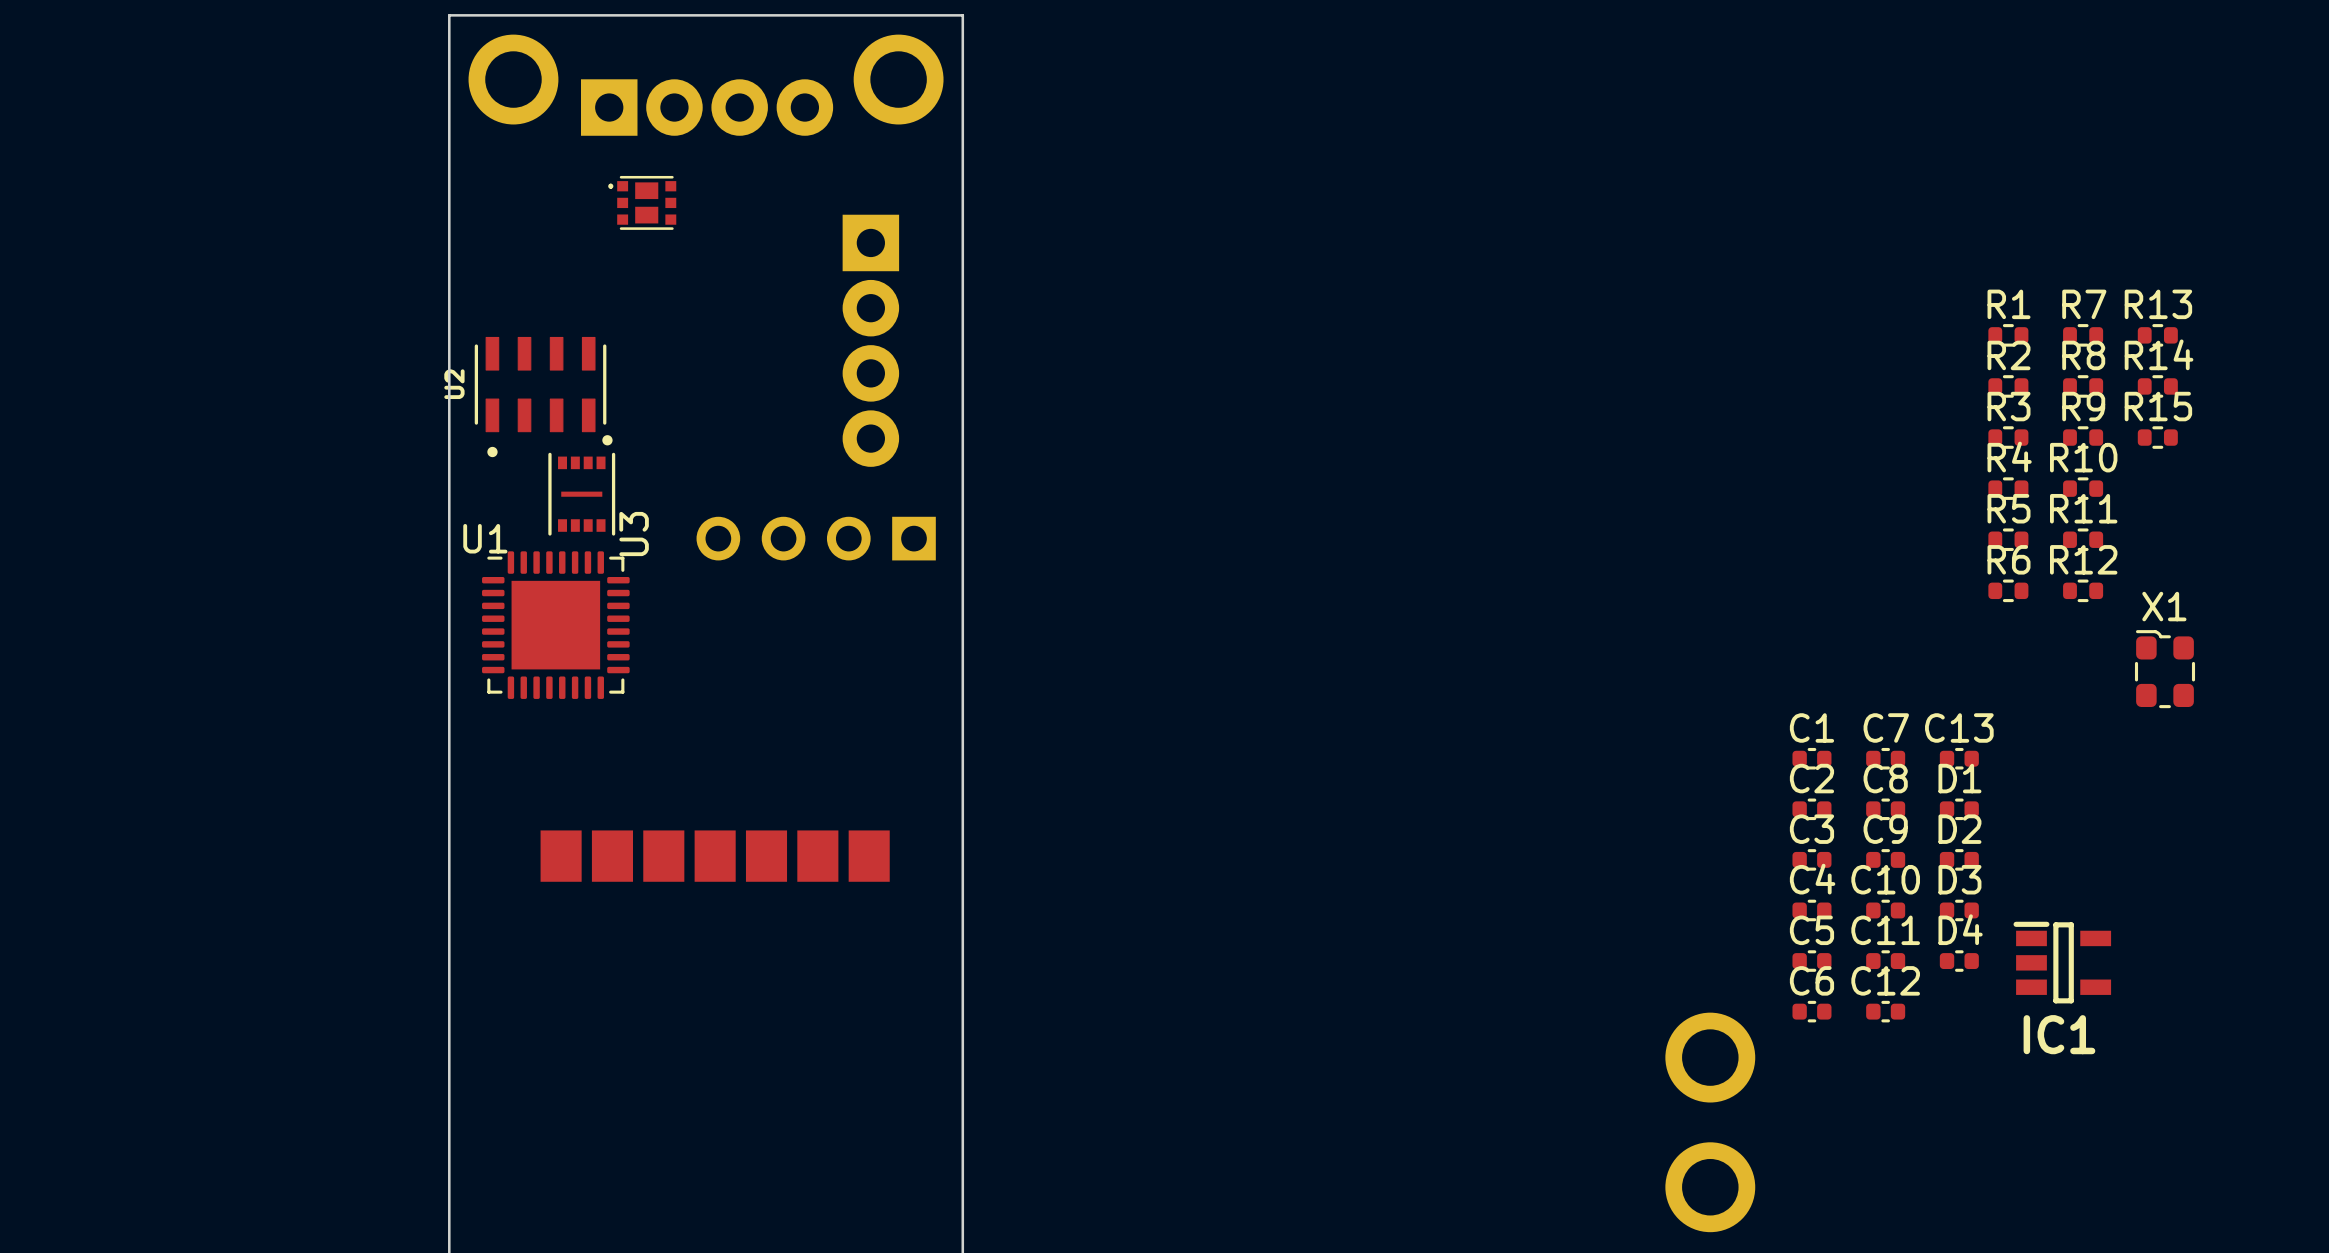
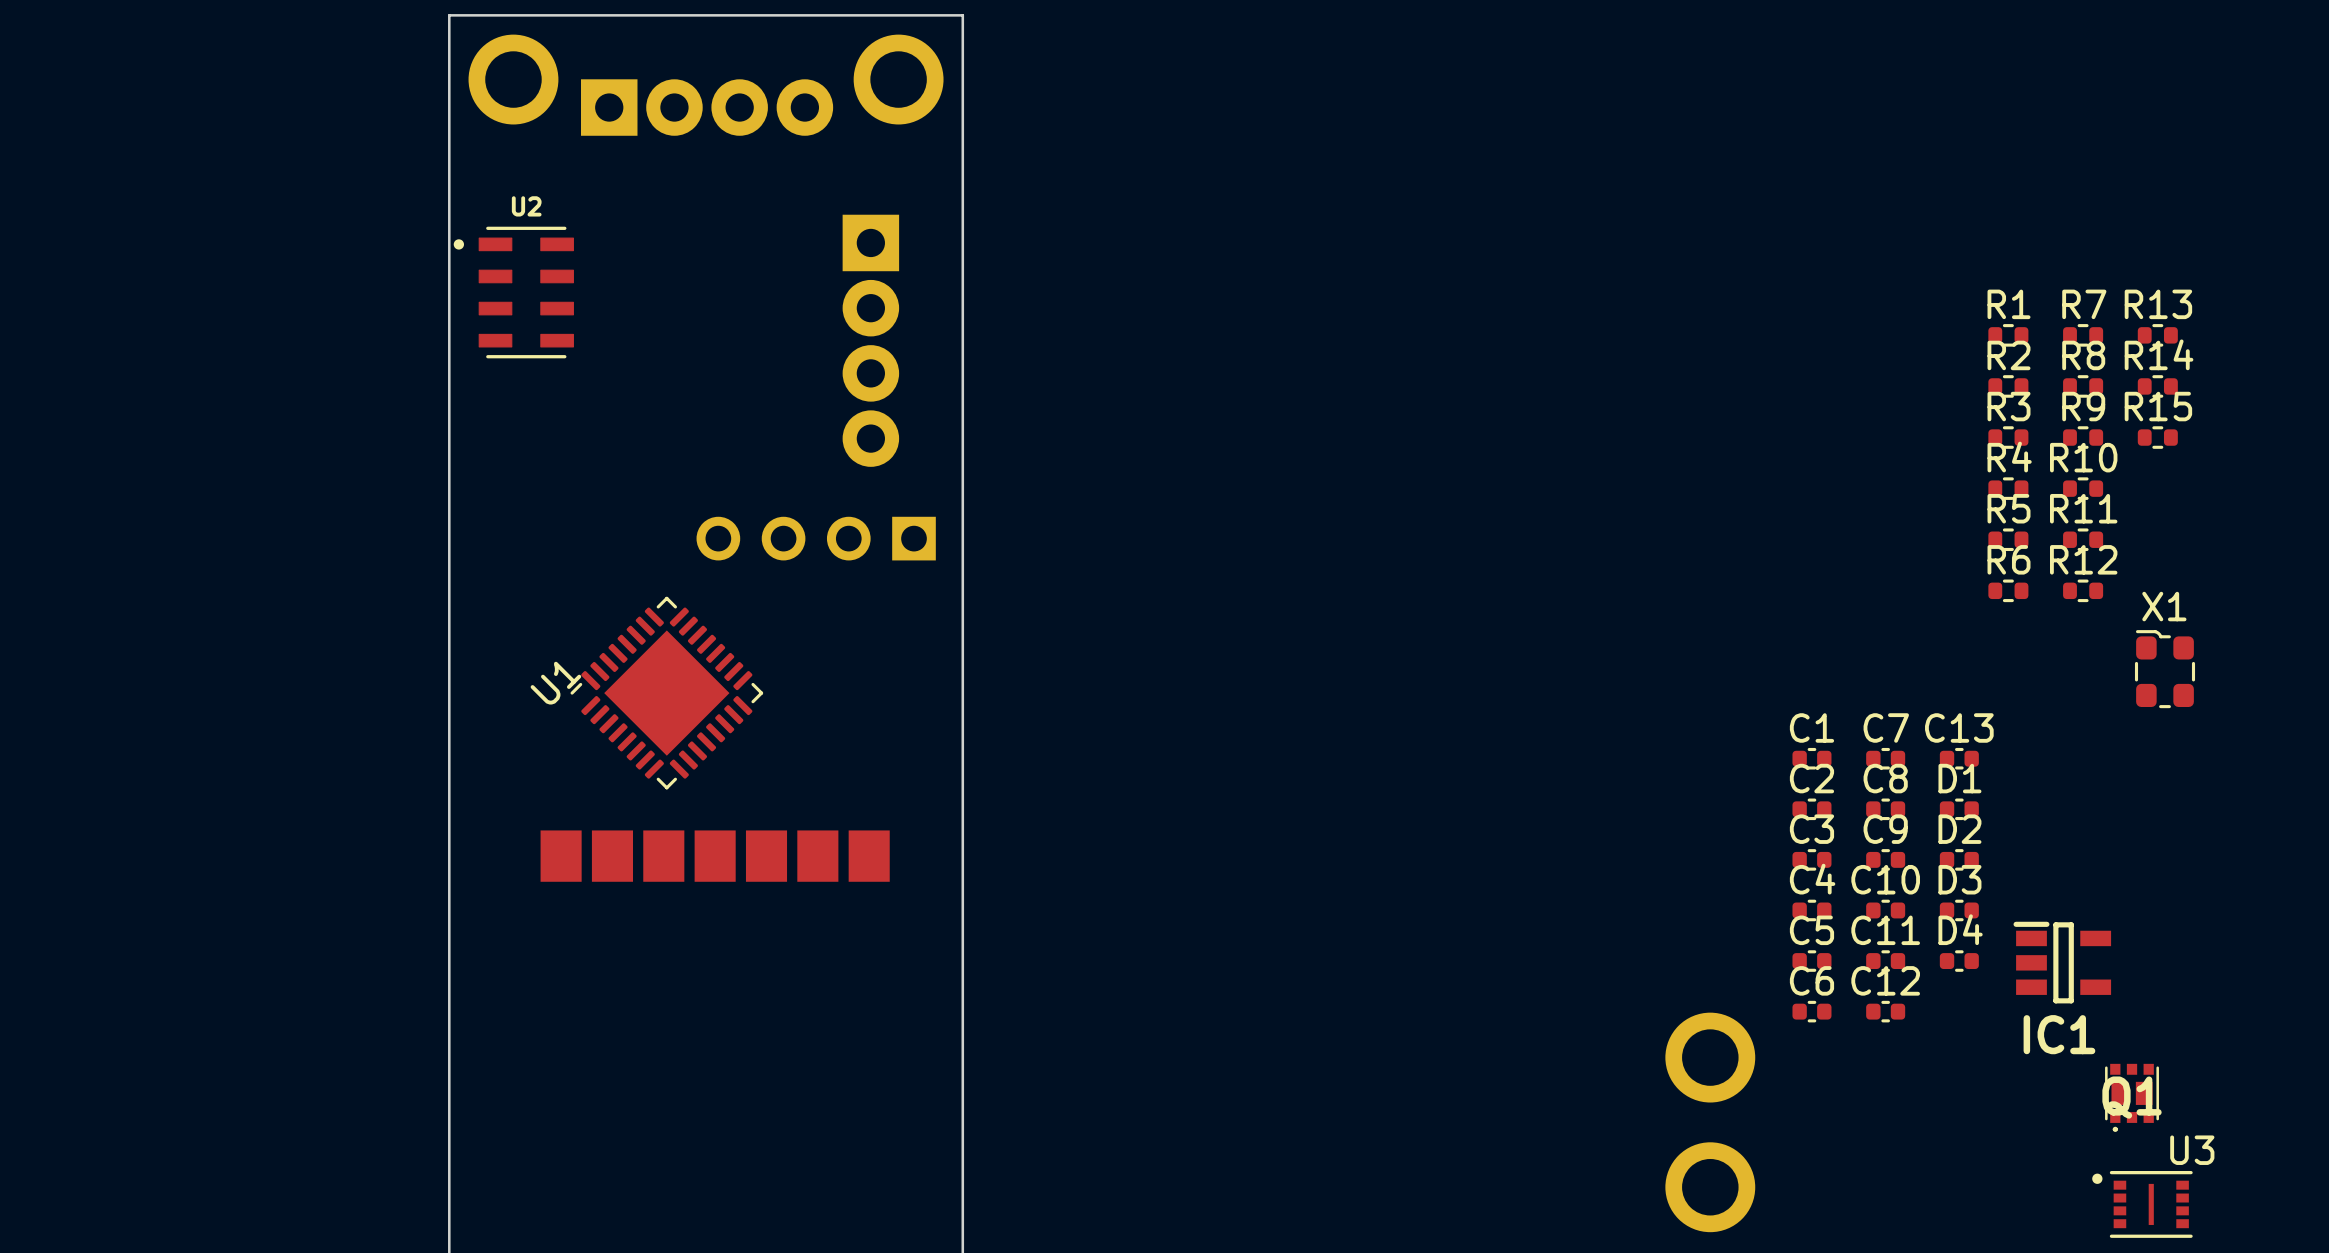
part: (642, 202) -> none
U2 rotation: 0° (540, 397) -> 90° clockwise (513, 292)
U2 position: (540, 397) -> (513, 292)
U3 rotation: 0° (581, 485) -> 90° counterclockwise (2142, 1204)
U3 position: (581, 485) -> (2142, 1204)
U1 rotation: 0° (555, 625) -> 45° counterclockwise (666, 693)
U1 position: (555, 625) -> (666, 693)
Q1: none -> (2132, 1097)

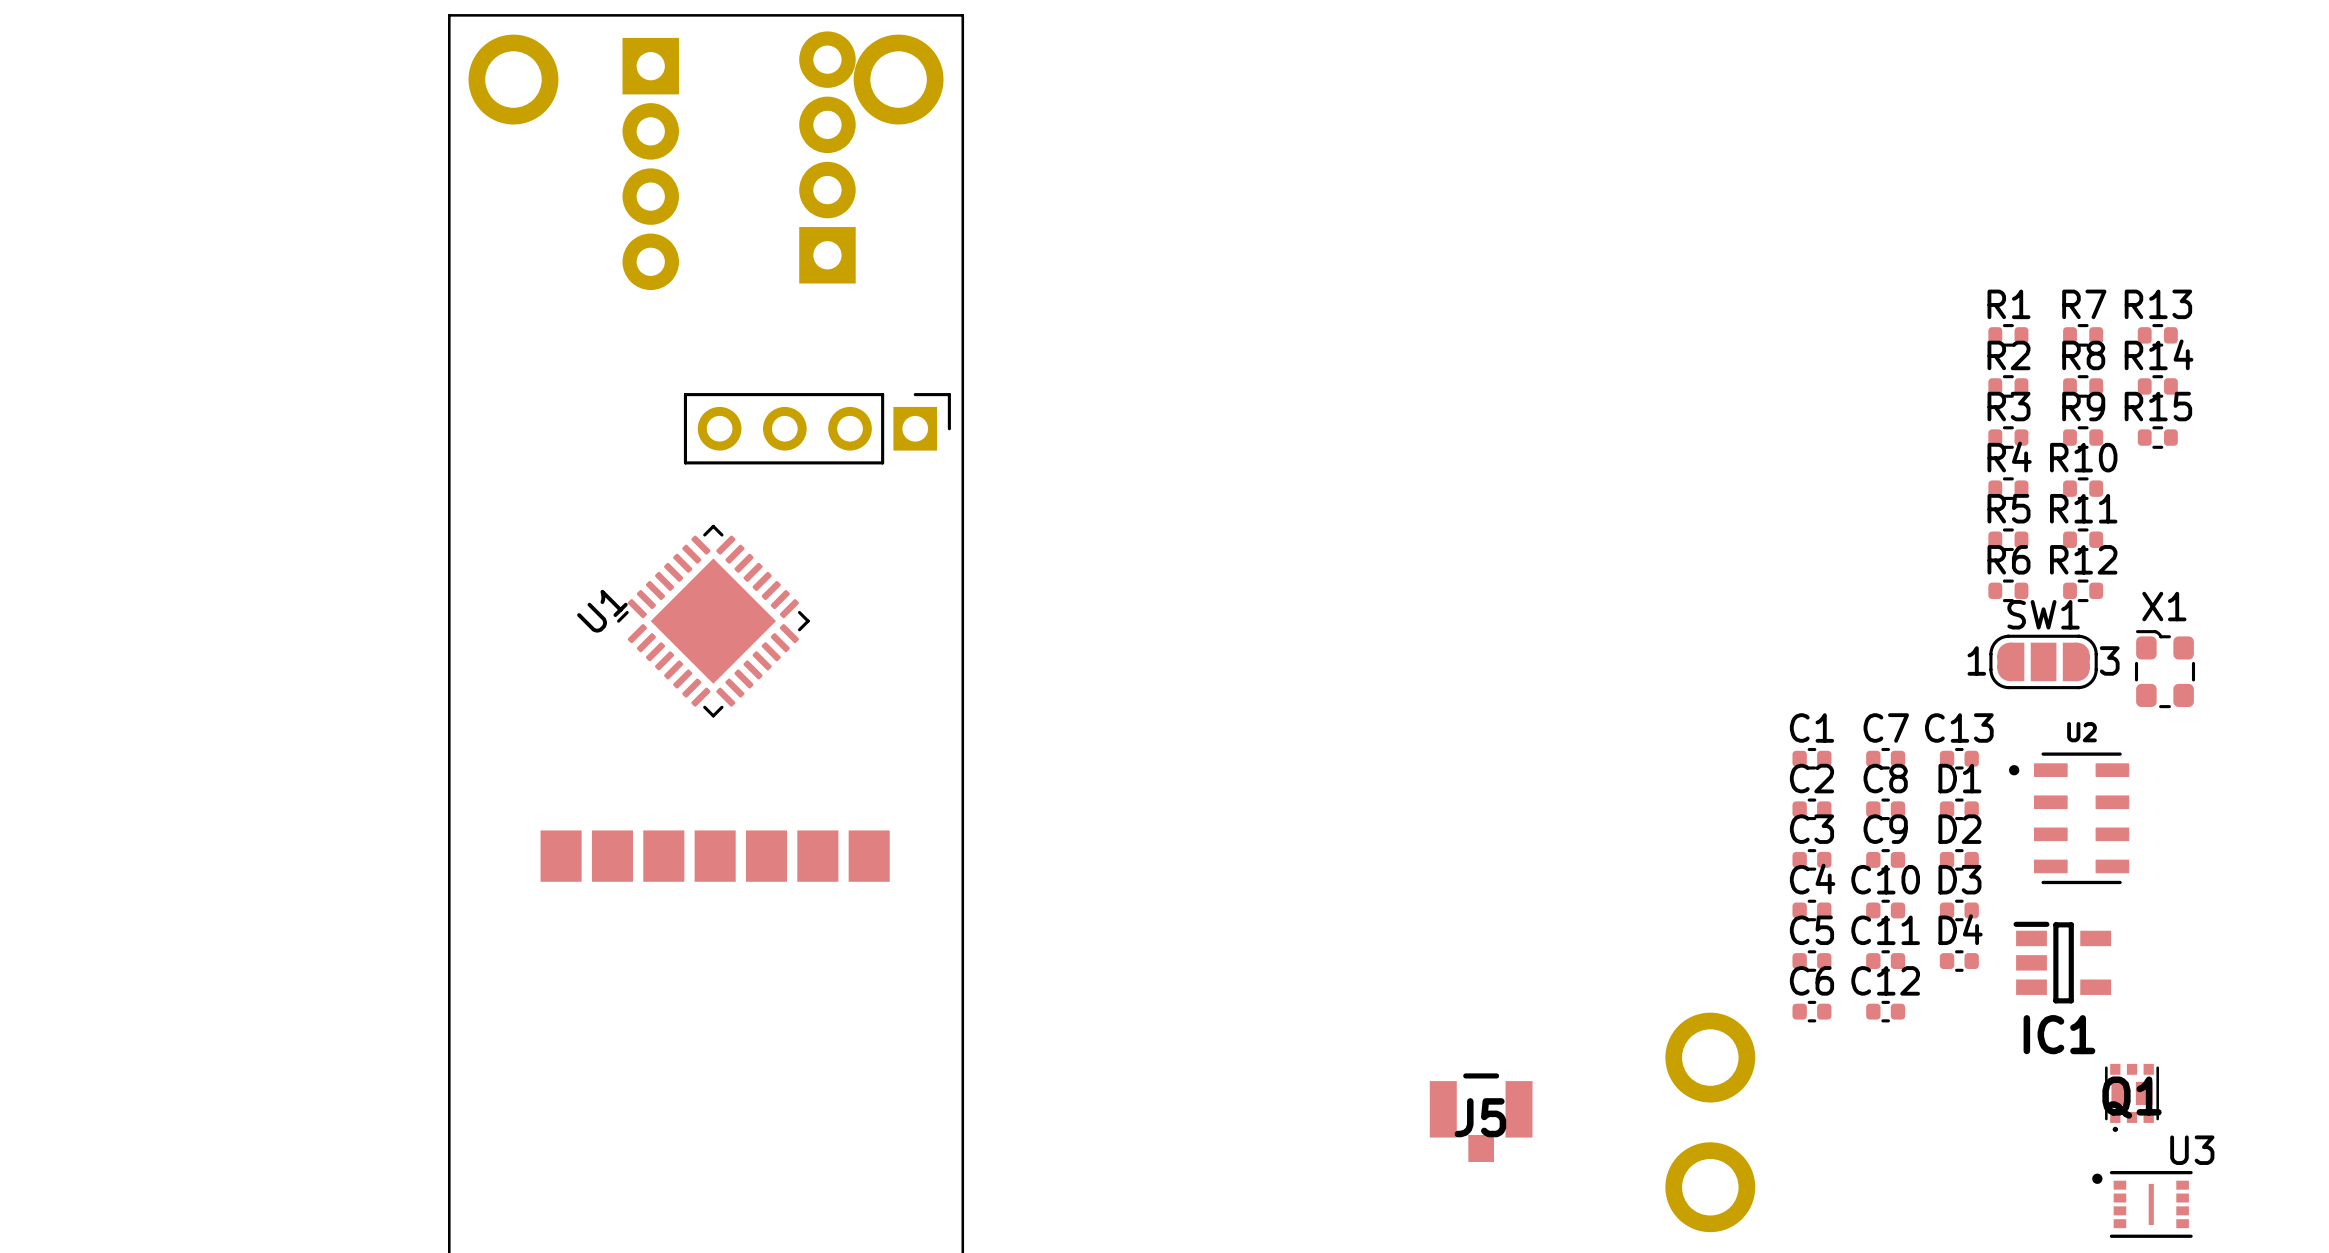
part: (707, 107) -> none
part: none -> (827, 157)
part: none -> (650, 163)
U2 position: (513, 292) -> (2069, 818)
part: (870, 340) -> none
part side: bottom (816, 538) -> top (817, 428)
SW1: none -> (2043, 661)
U1 position: (666, 693) -> (713, 621)
J5: none -> (1481, 1117)

